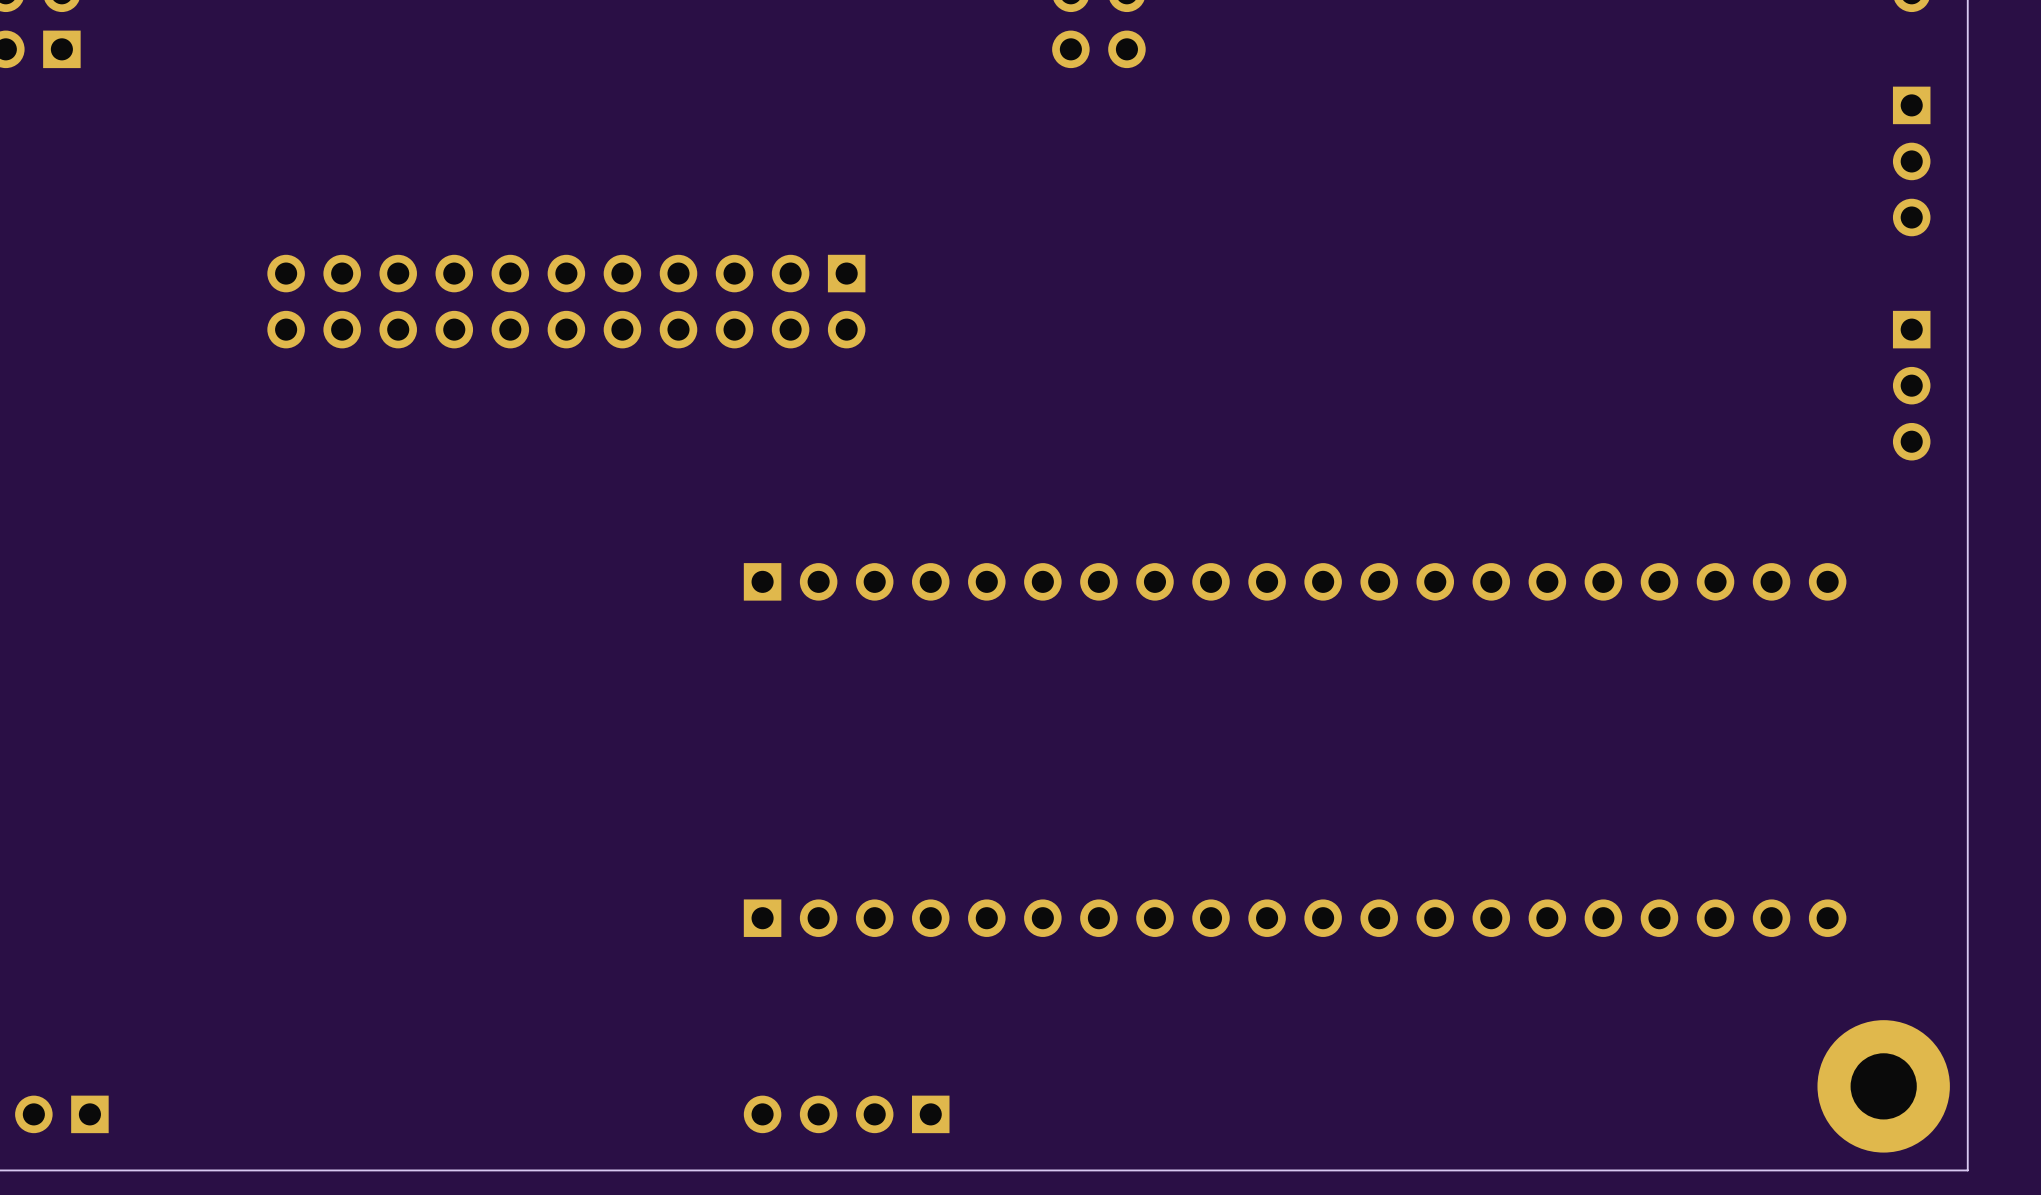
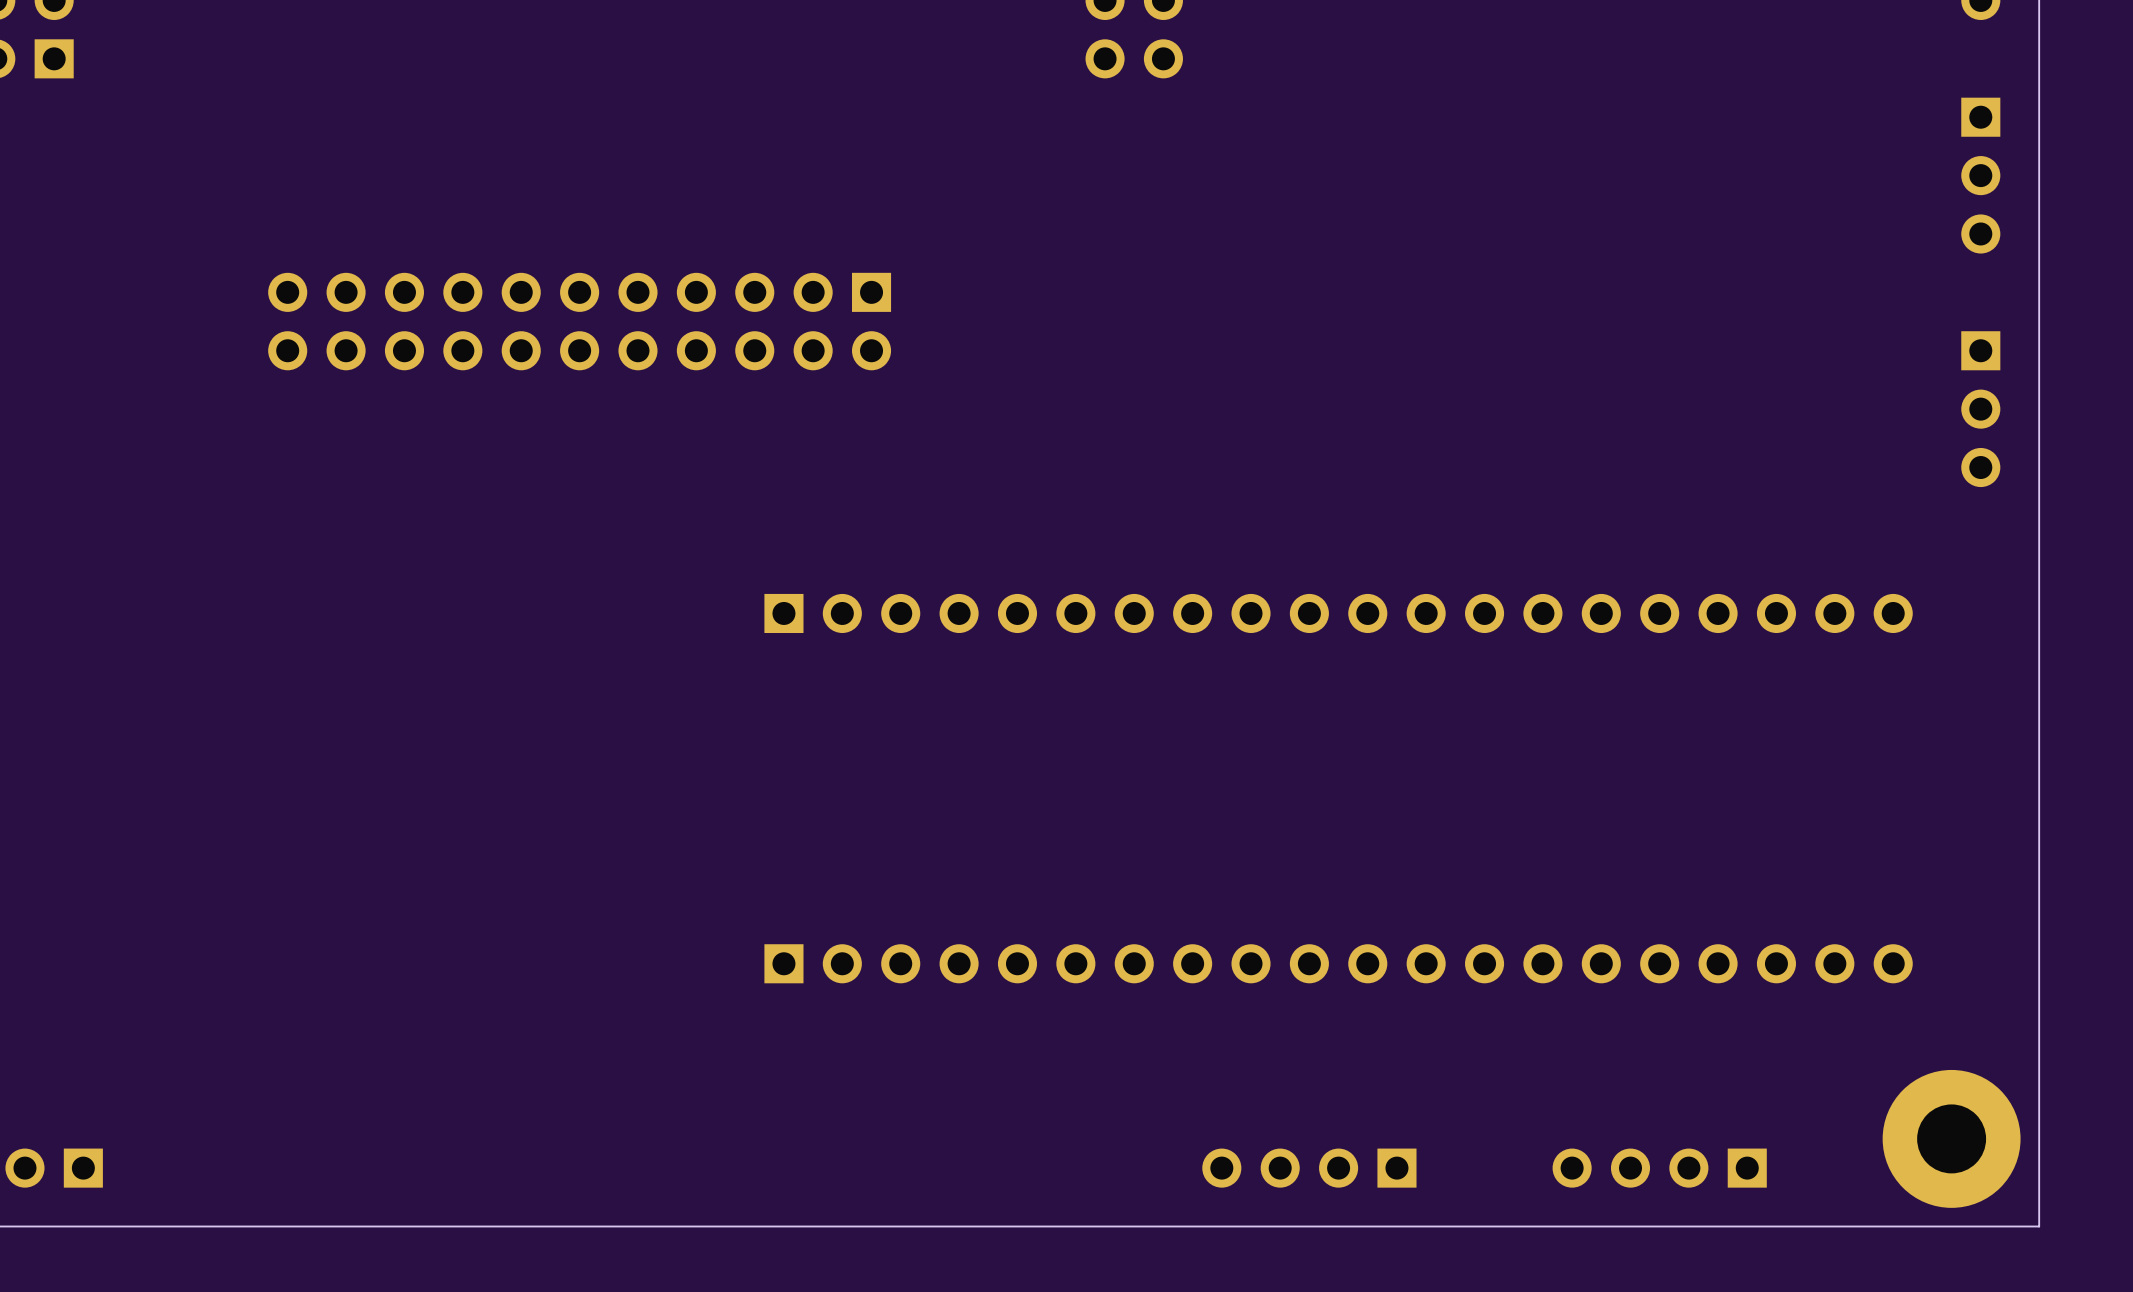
part: (846, 1114) -> none
part: none -> (1309, 1168)
part: none -> (1659, 1168)

